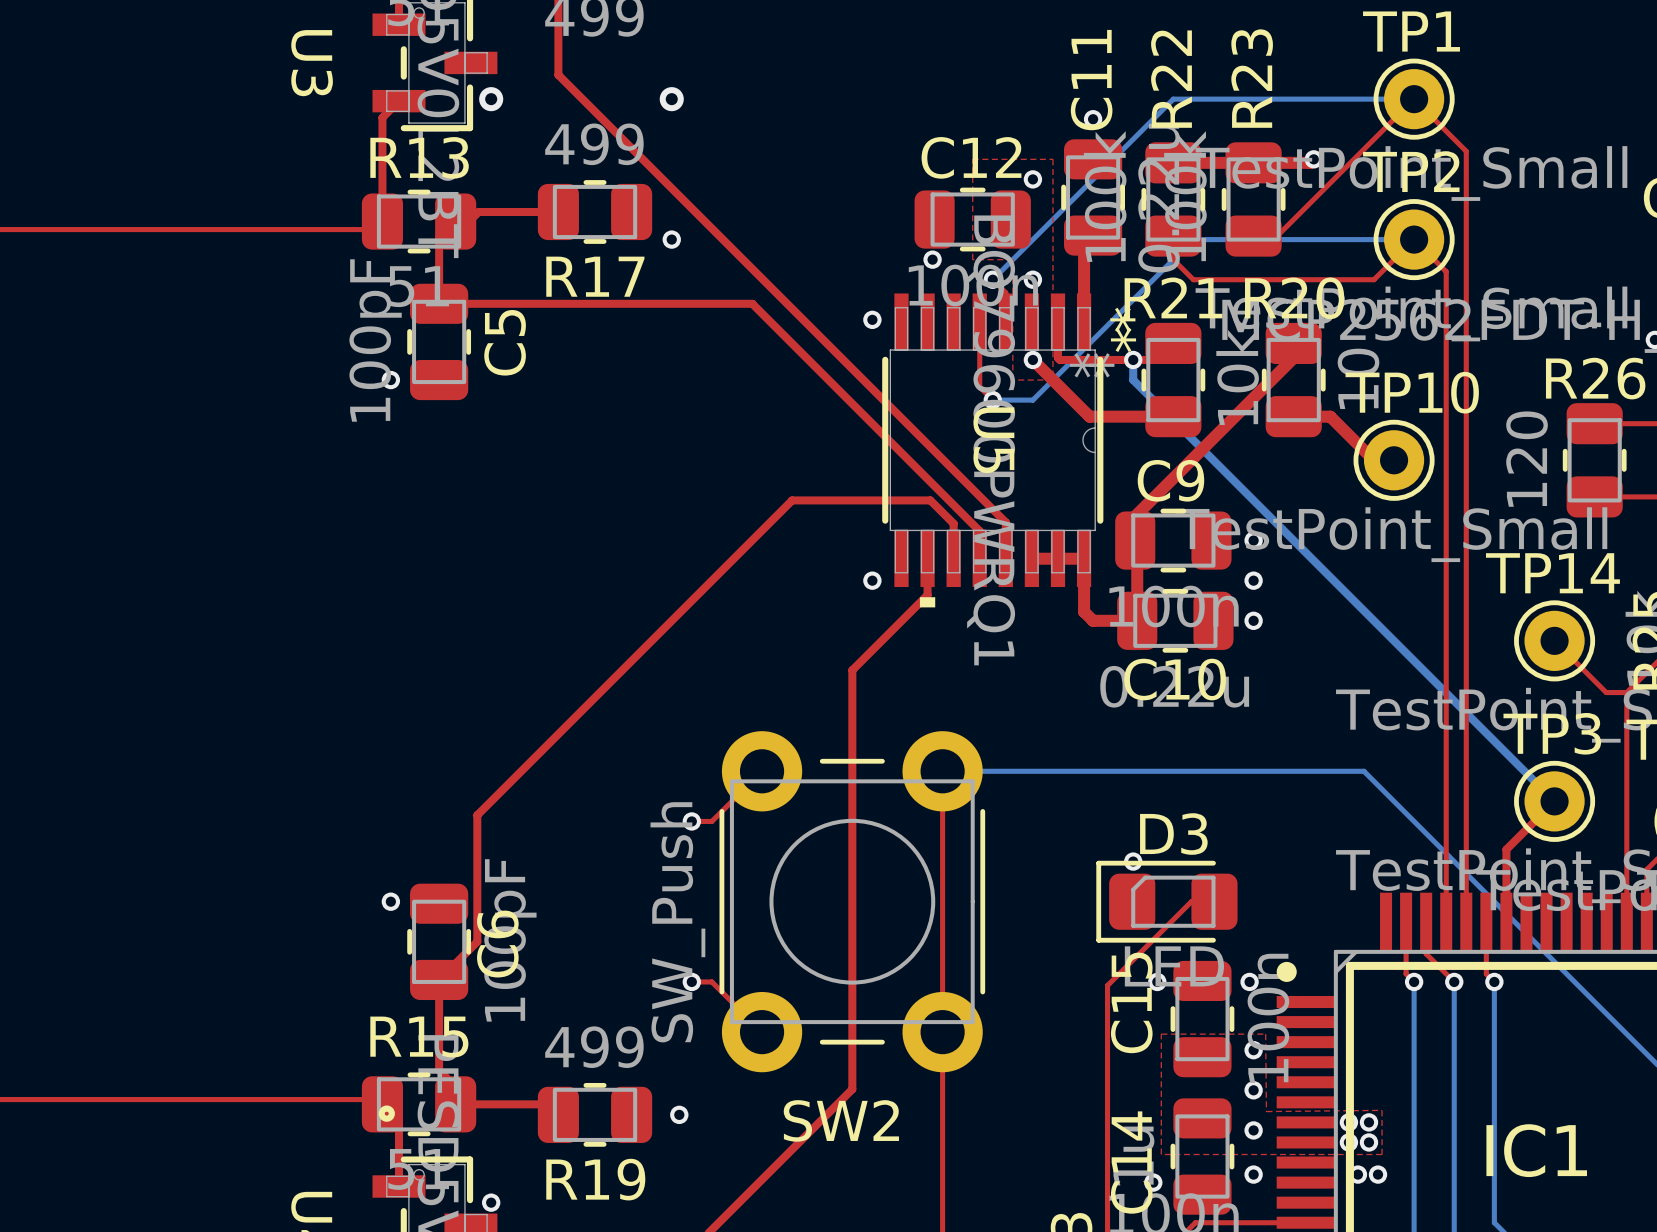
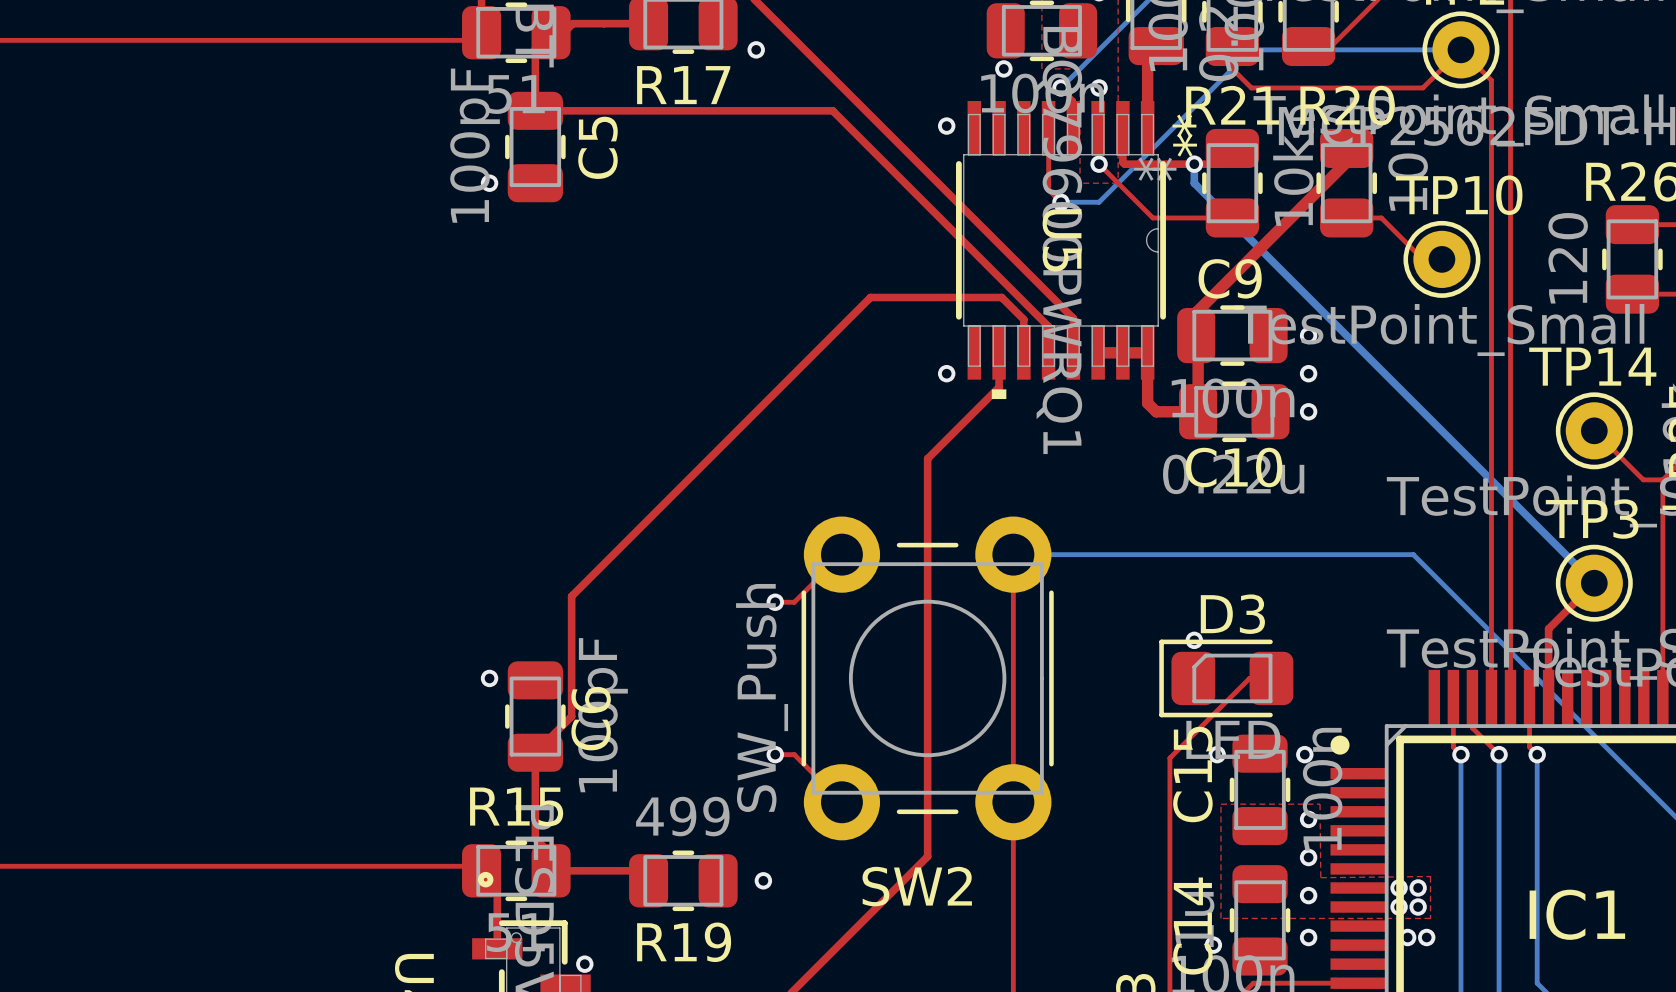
top track width: thick (1032, 359) (1089, 416) (1173, 416) -> thin (1099, 164) (1152, 217) (1232, 217)
top track width: thick (1293, 416) (1330, 416) (1373, 460) (1394, 460) -> thin (1346, 217) (1381, 217) (1422, 259) (1441, 259)

